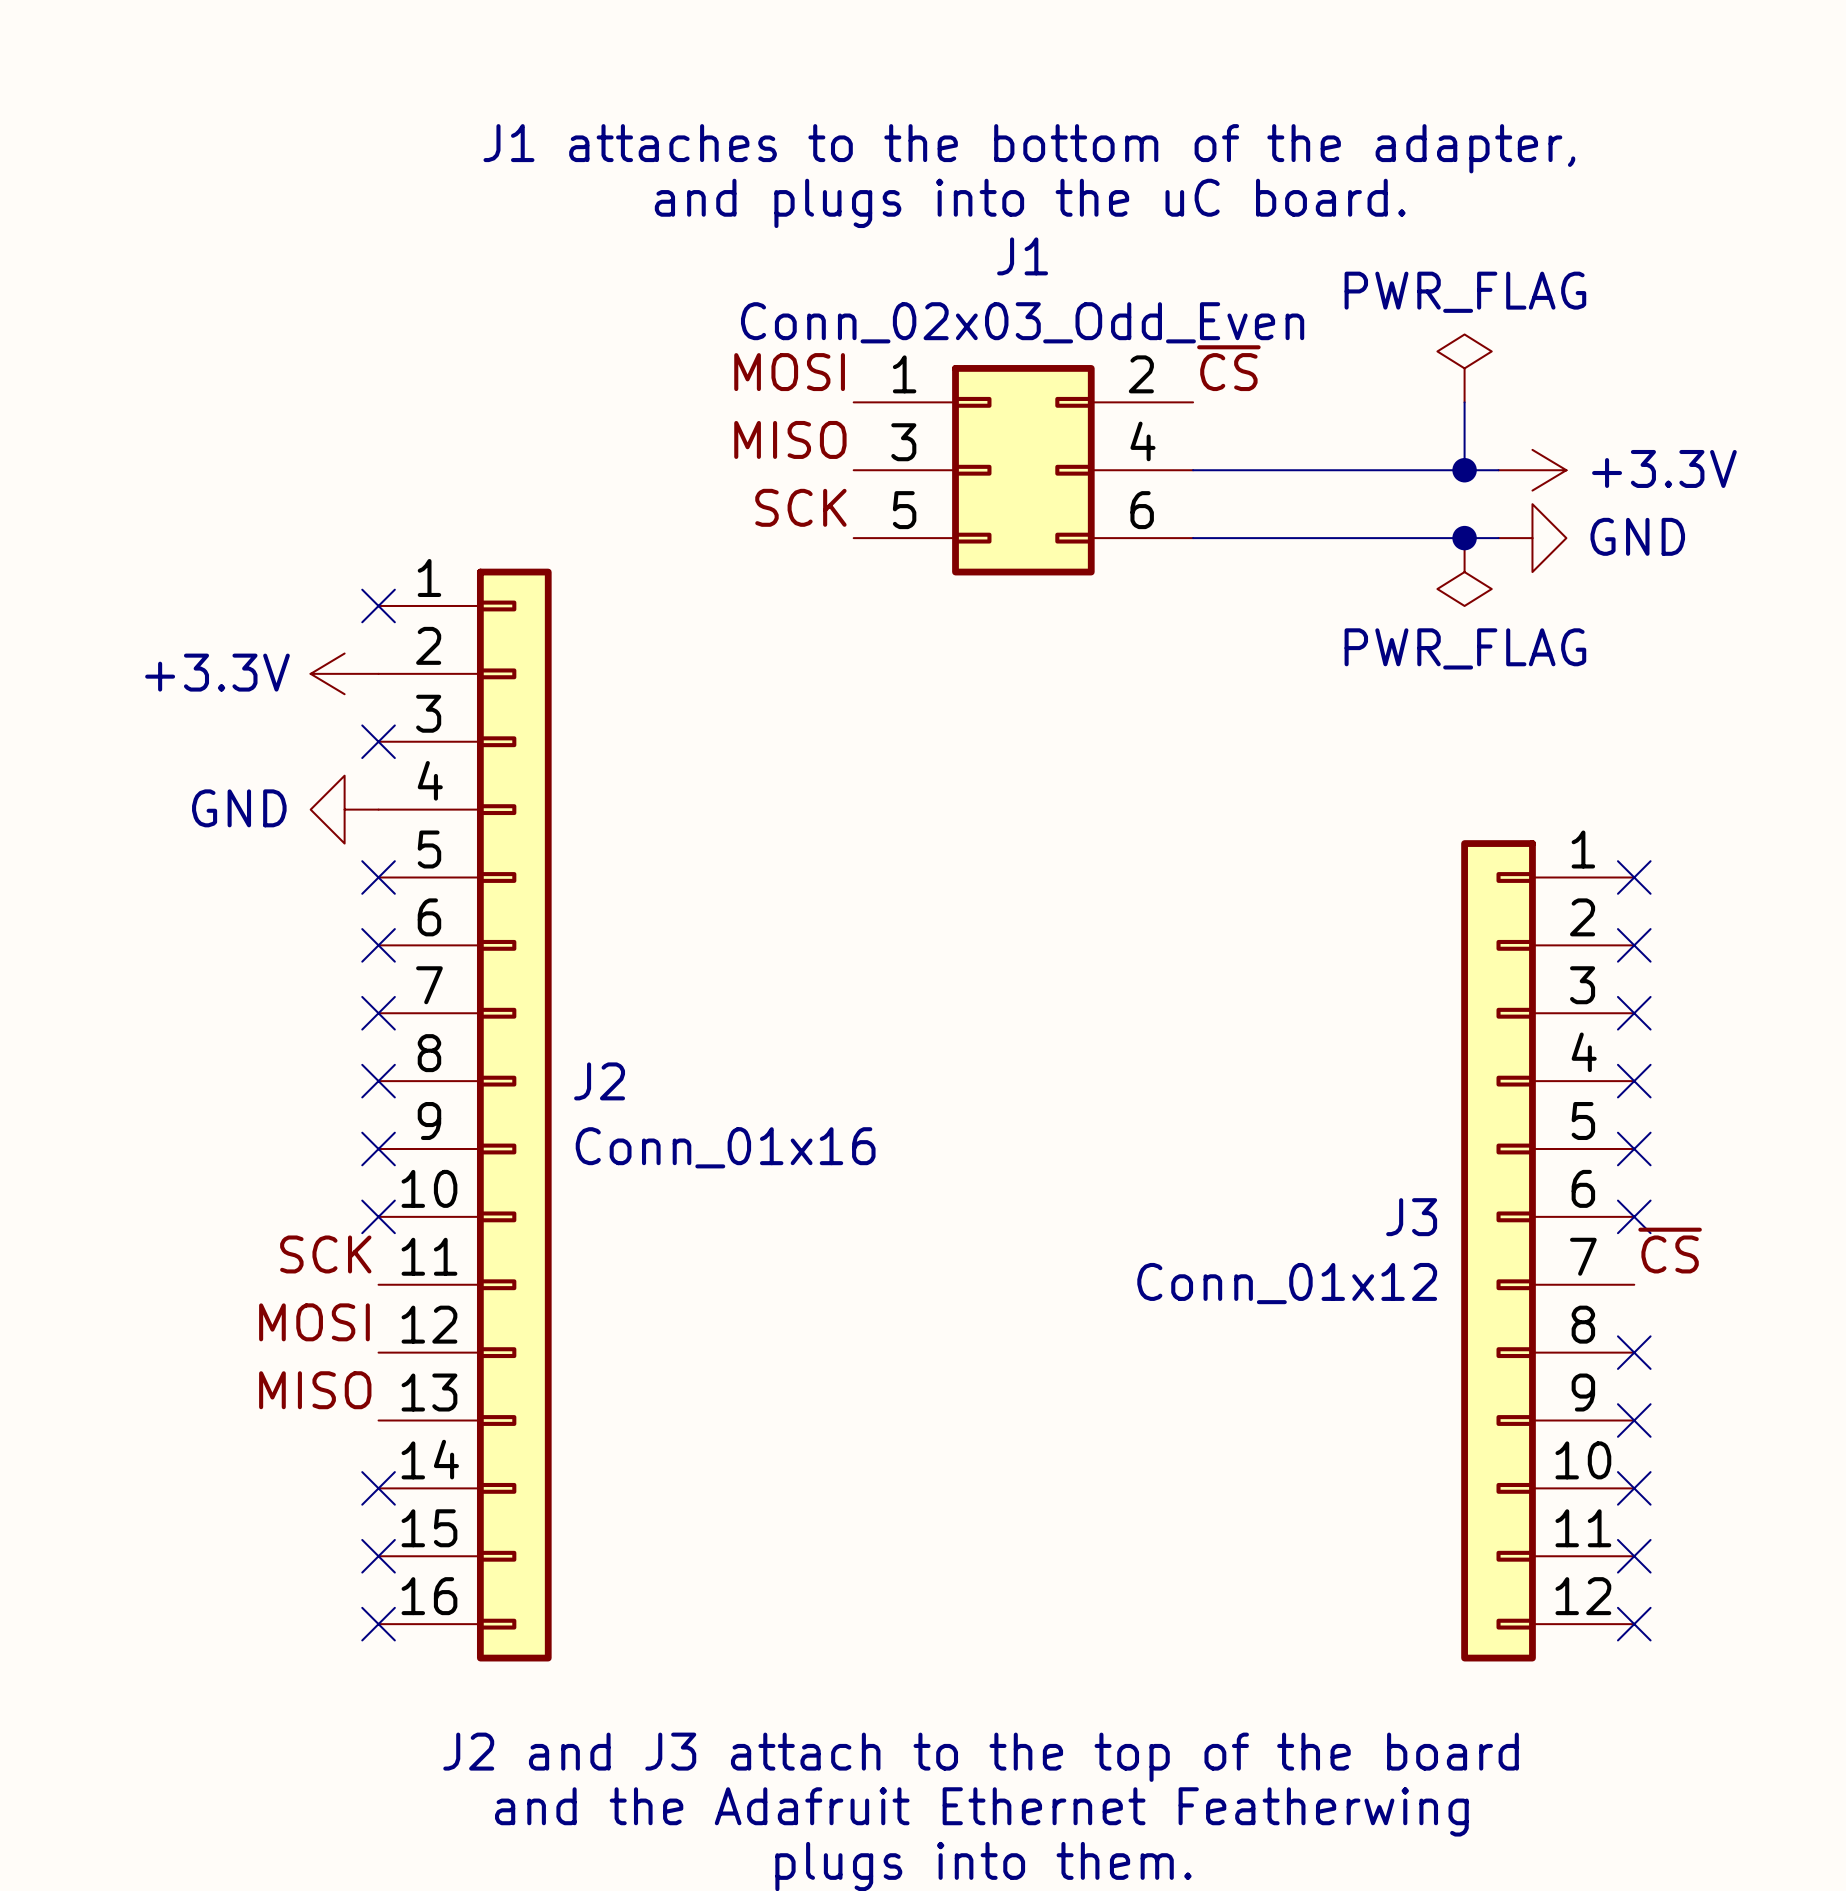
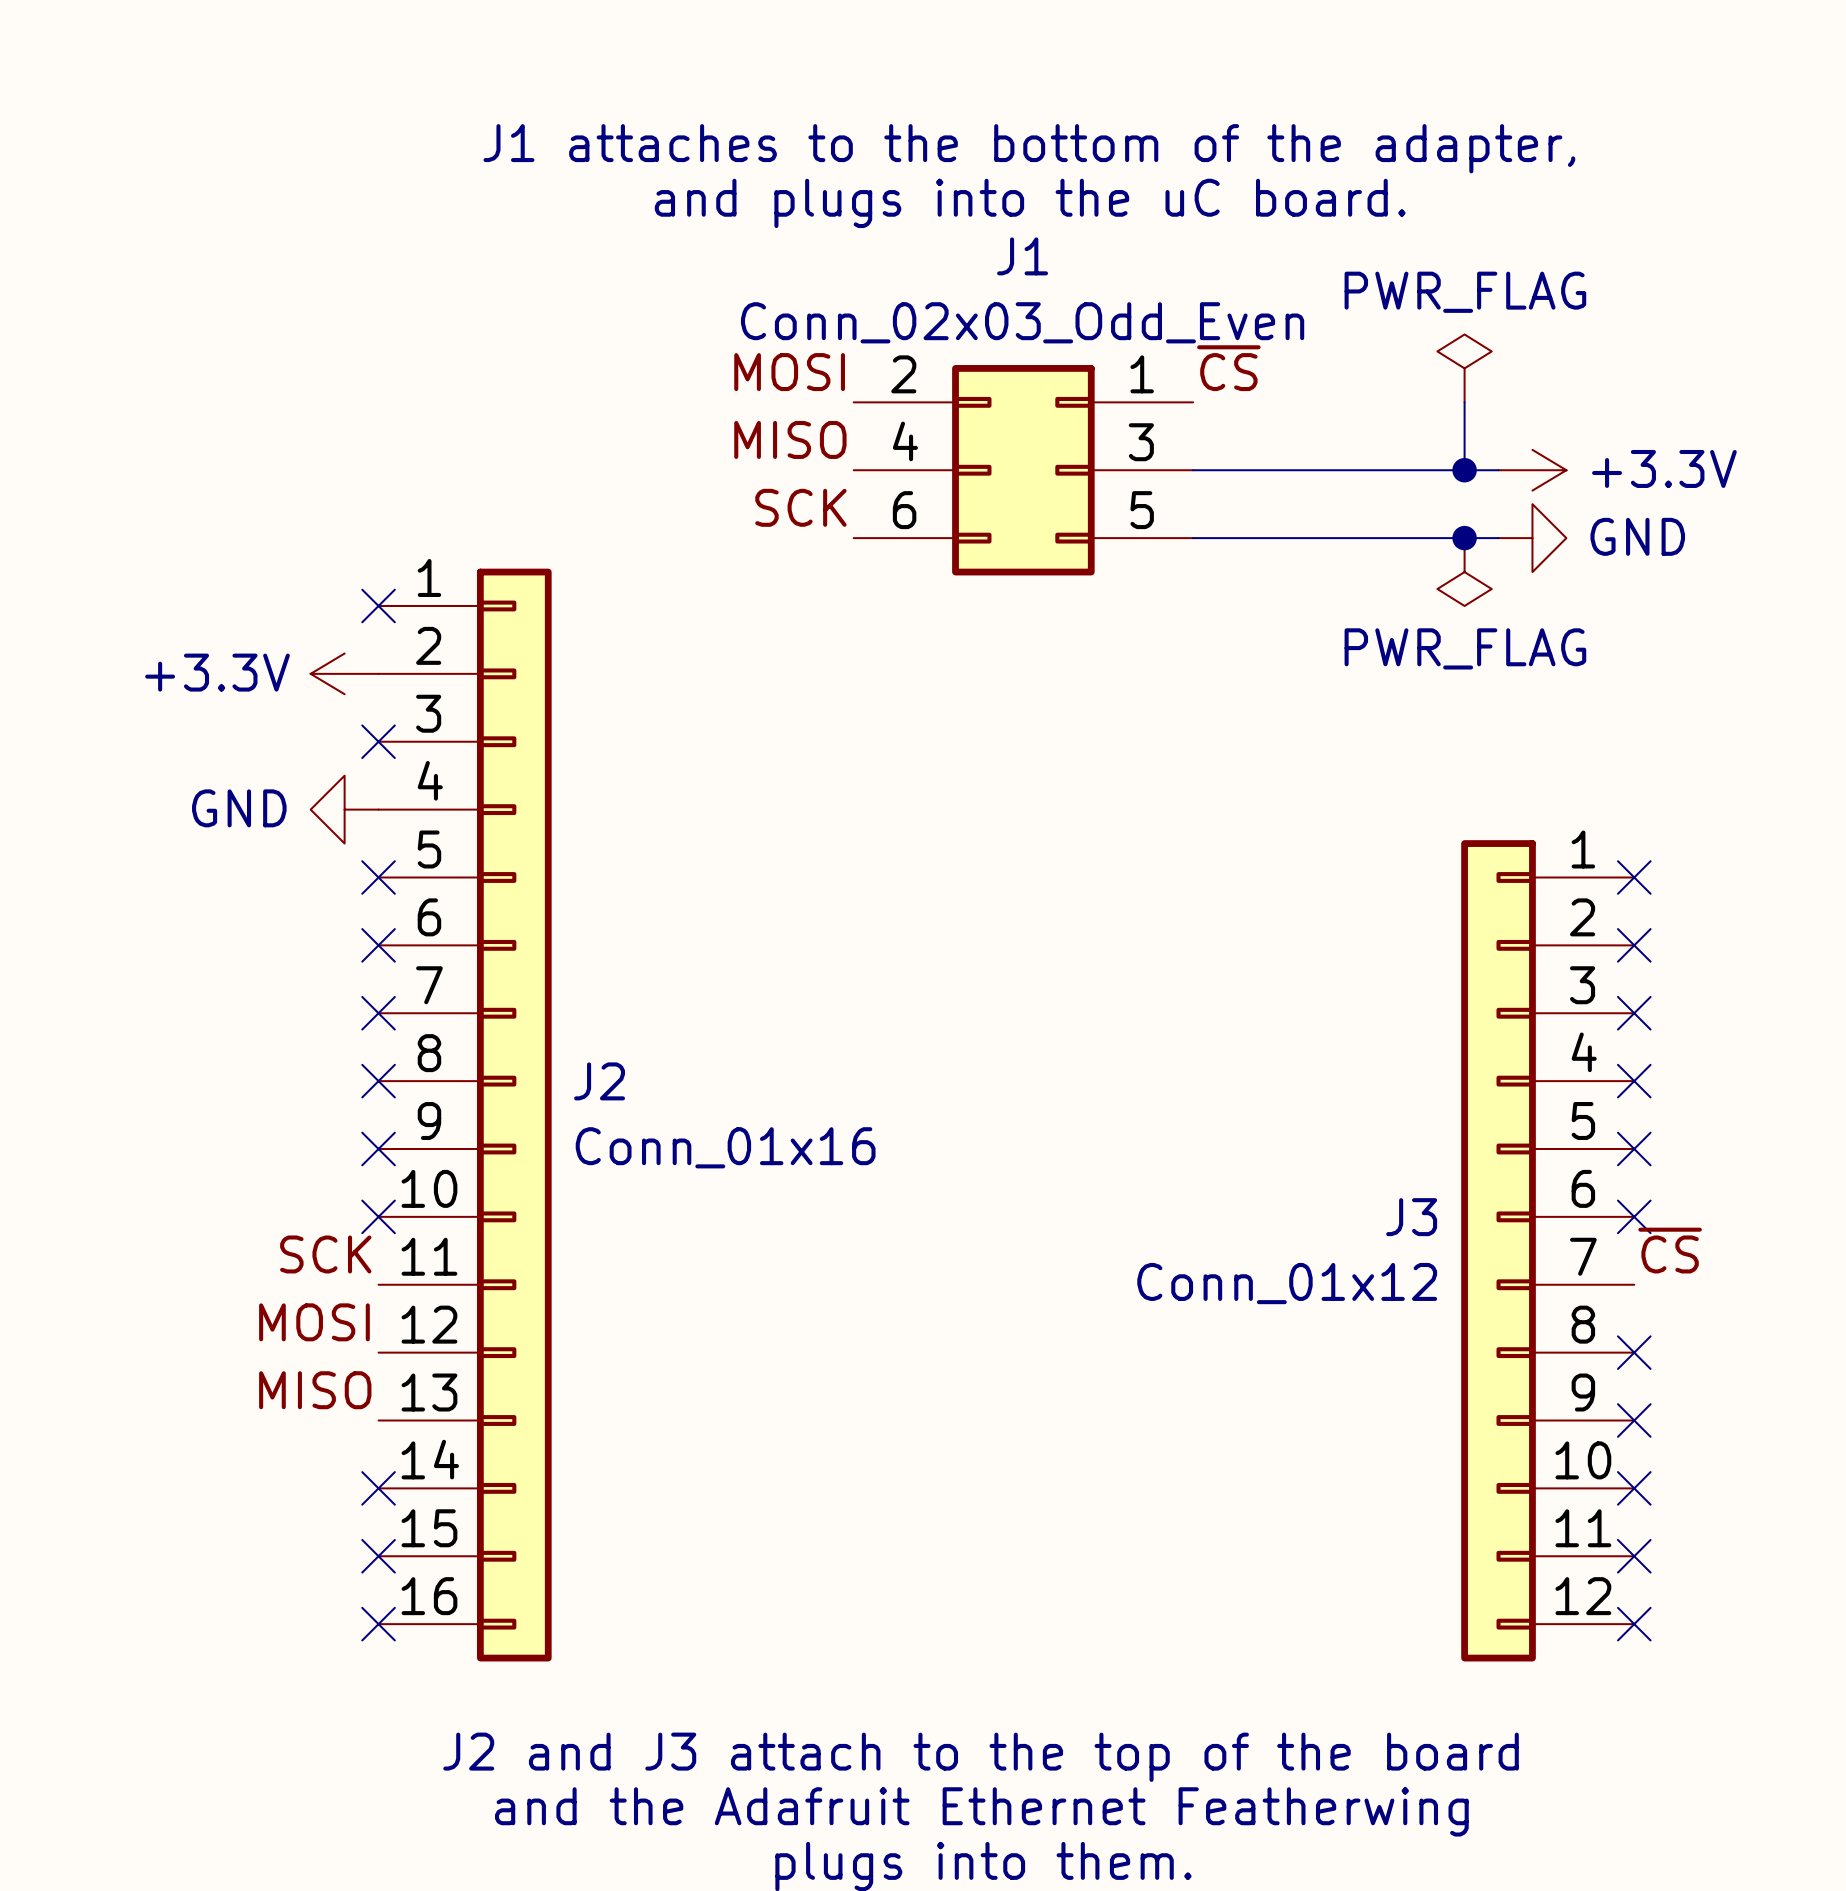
J1 flip: as is (1023, 470) -> left-right (1023, 470)

